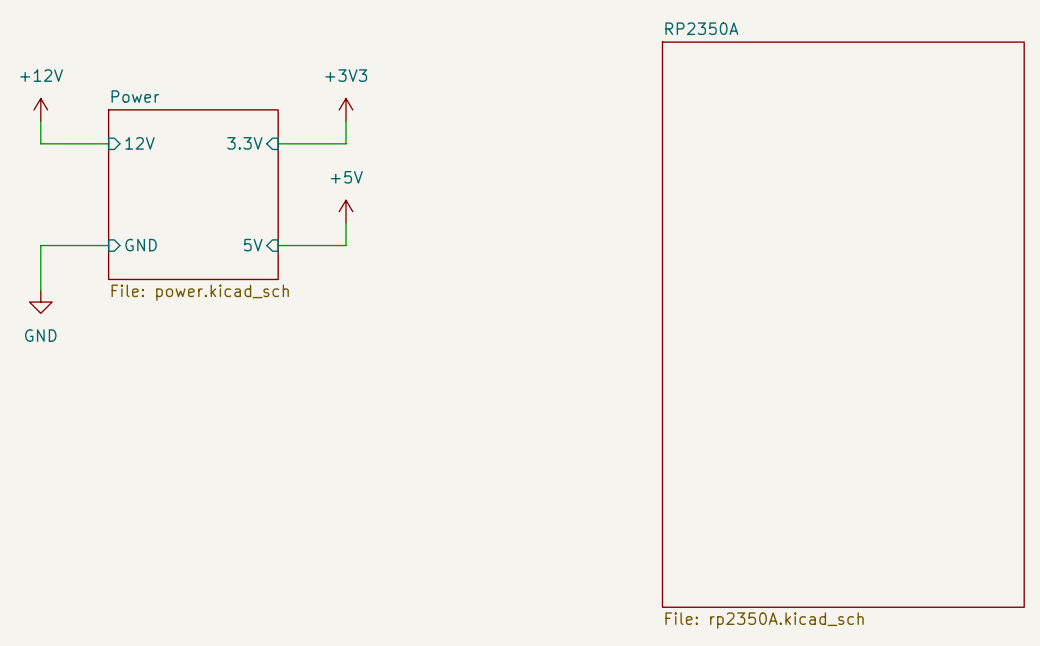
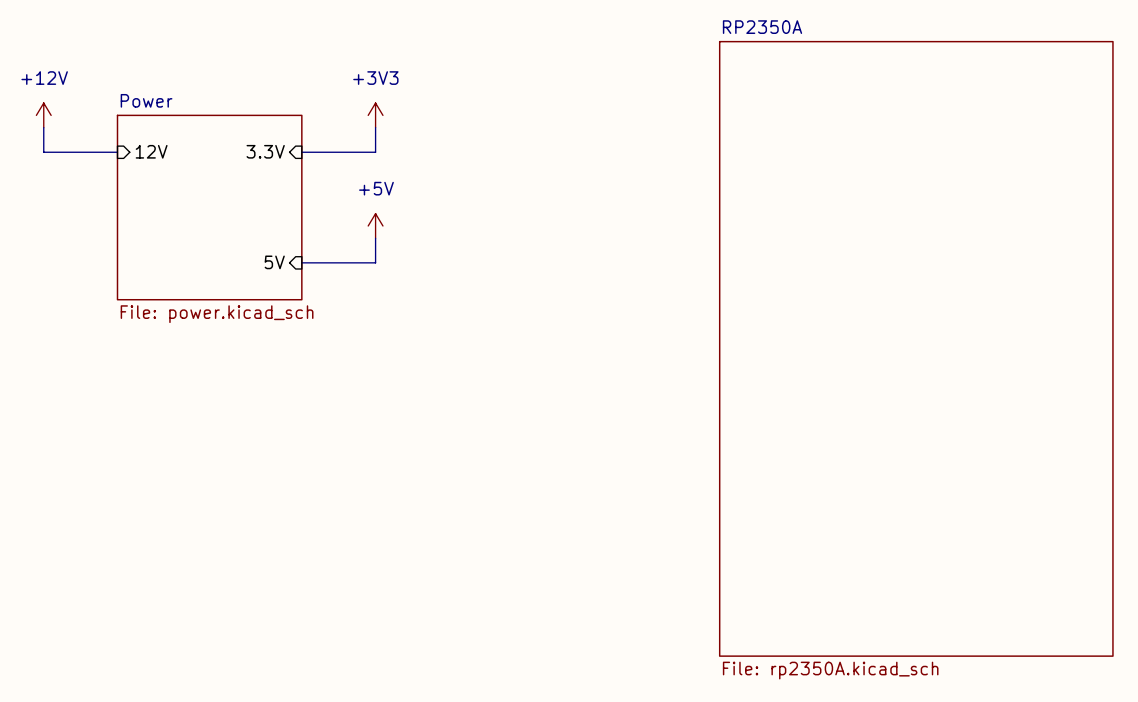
wire: (108, 245) (40, 245) (40, 290) -> none
sheet pin: GND (141, 245) -> none
power symbol: GND (40, 302) -> none

